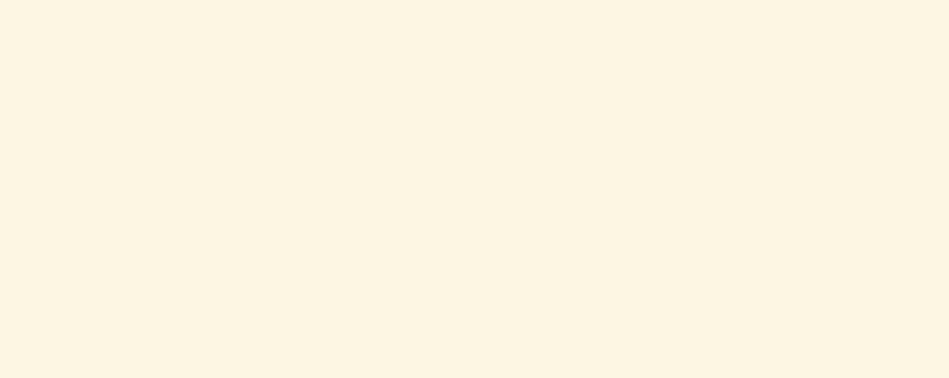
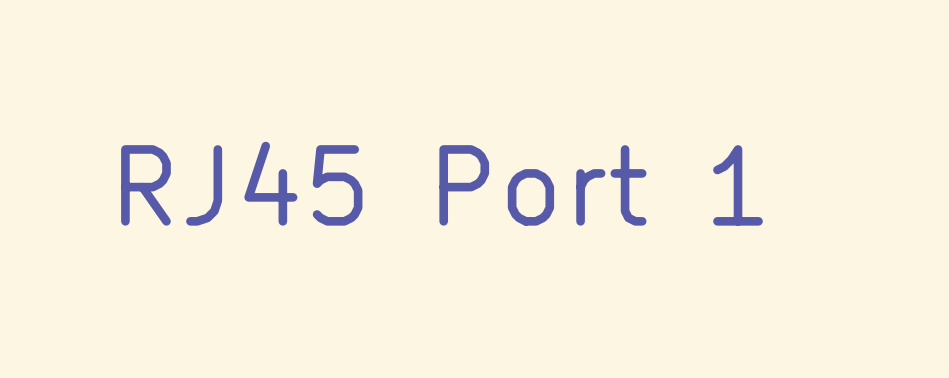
text: none -> RJ45 Port 1 (441, 183)

